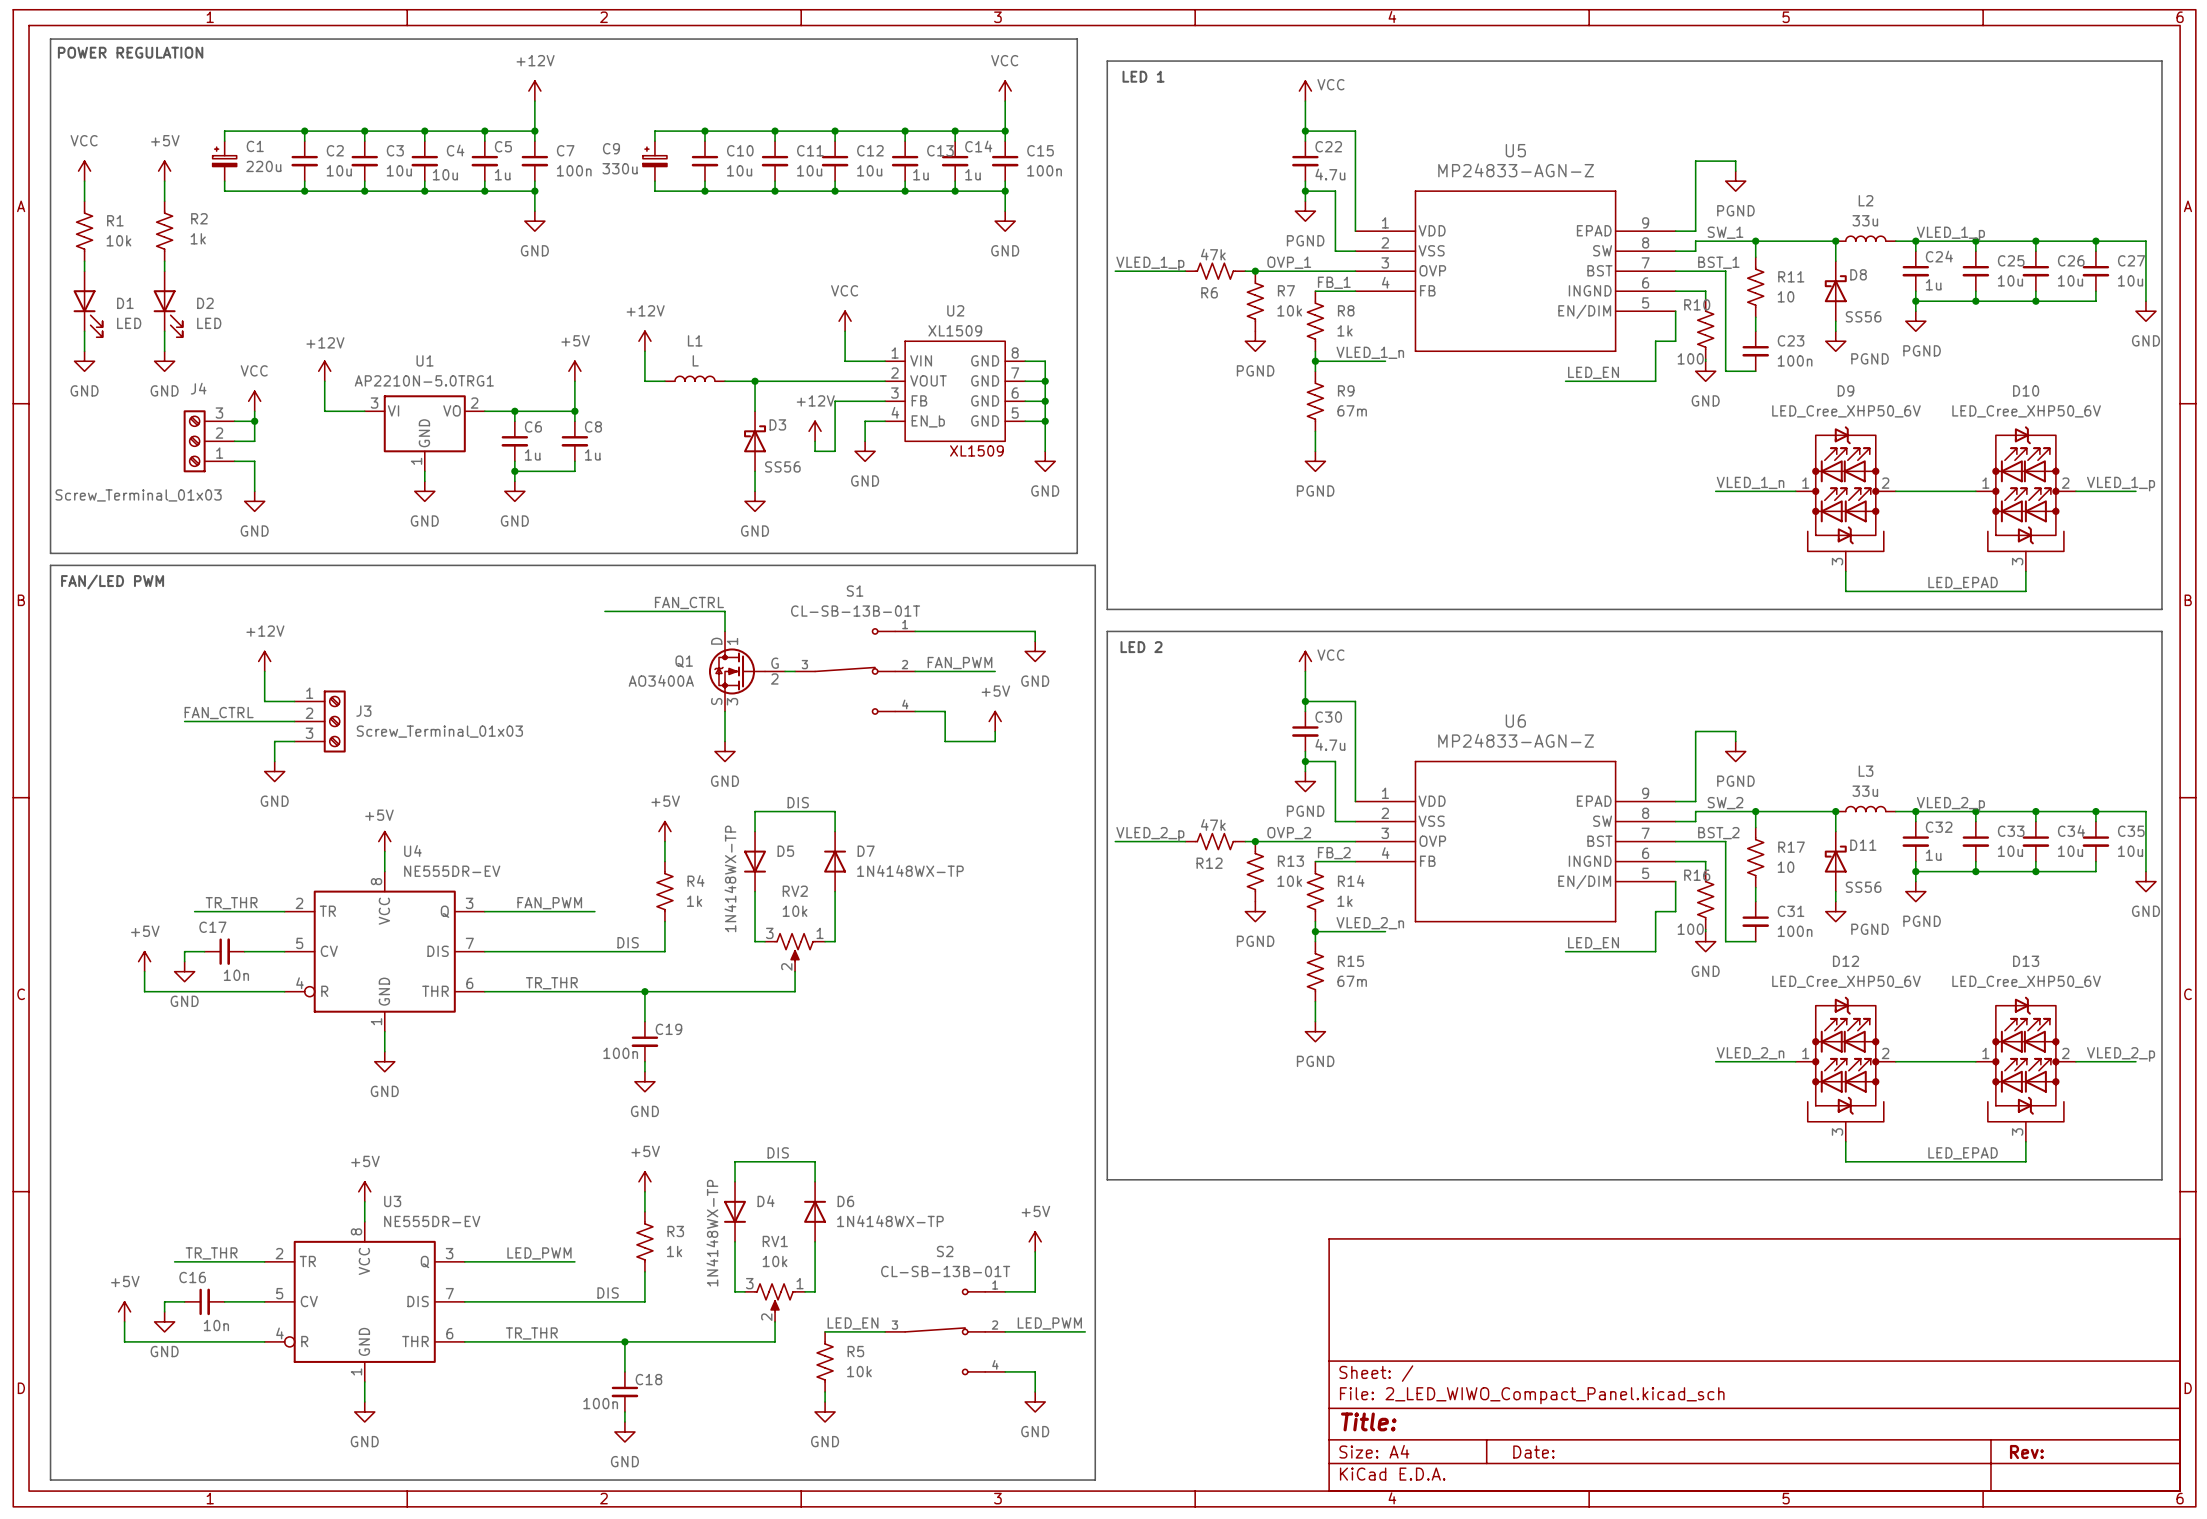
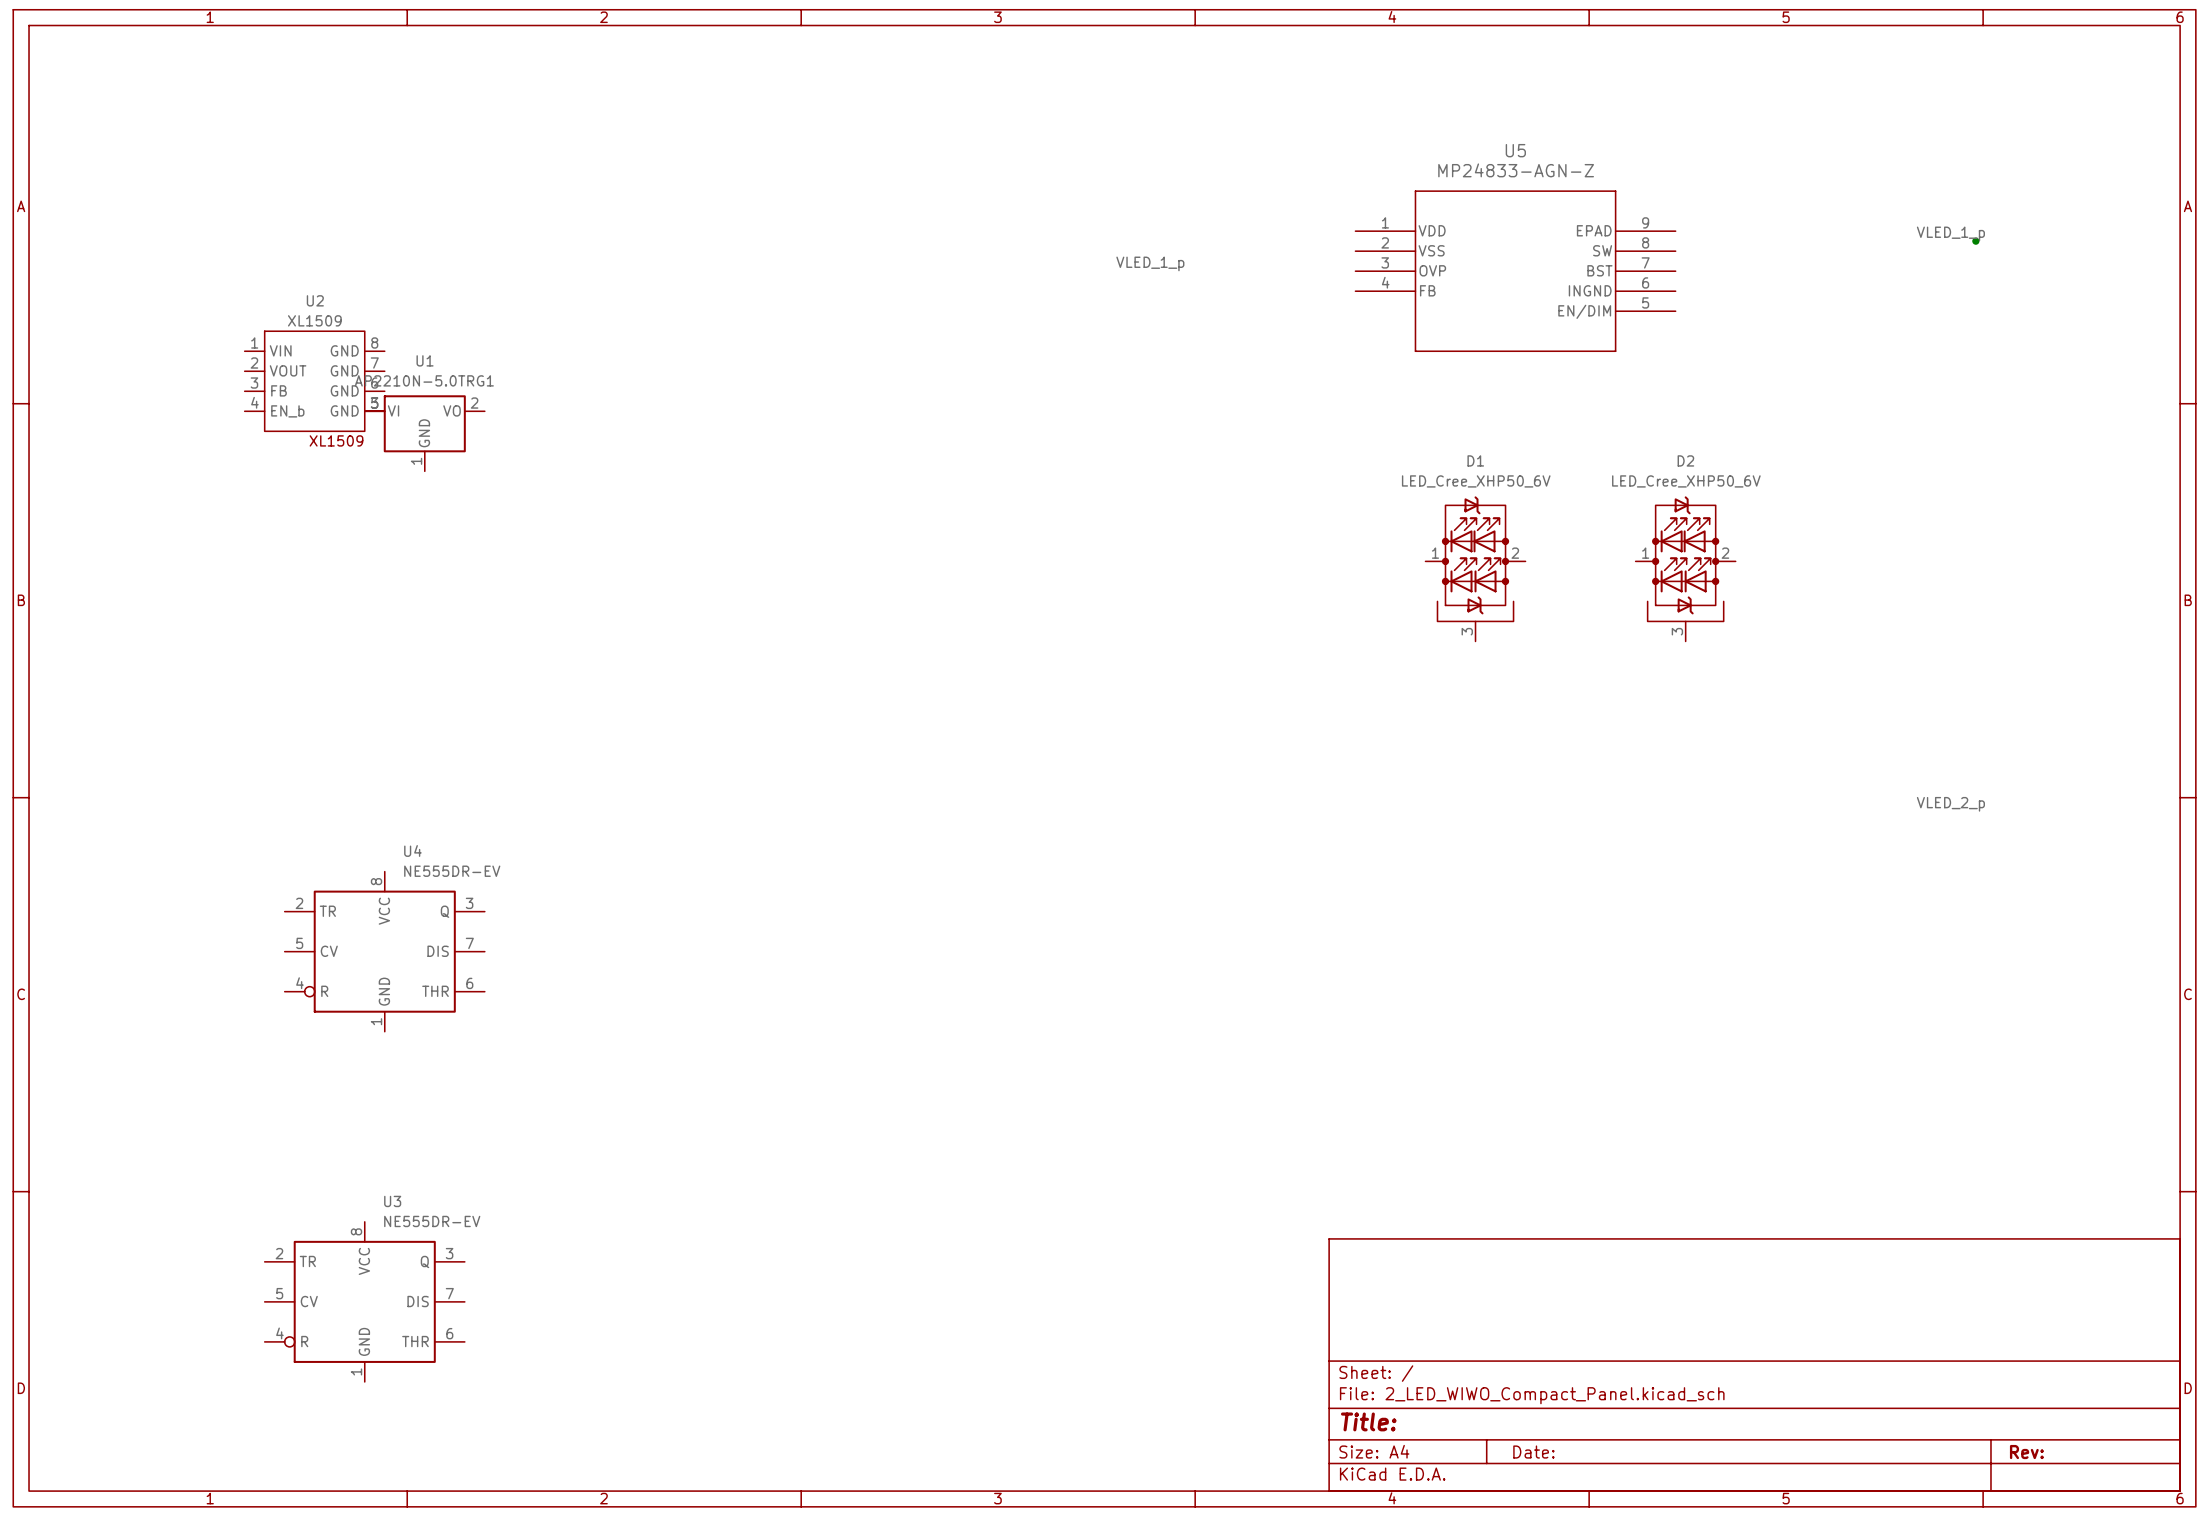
line: (50, 39) (50, 553) (1077, 553) (1077, 39) (50, 39) -> none
text: POWER REGULATION (130, 52) -> none
line: (1107, 61) (2161, 61) (2161, 609) (1107, 609) (1107, 61) -> none
text: LED 1 (1143, 76) -> none
power symbol: +12V (534, 91) -> none
power symbol: VCC (1005, 91) -> none
power symbol: VCC (1305, 91) -> none
wire: (534, 101) (534, 141) -> none
wire: (1005, 101) (1005, 141) -> none
wire: (1305, 101) (1305, 141) -> none
wire: (304, 131) (304, 141) -> none
junction: (304, 131) -> none
wire: (364, 131) (364, 141) -> none
junction: (364, 131) -> none
wire: (424, 131) (424, 141) -> none
junction: (424, 131) -> none
wire: (484, 131) (484, 141) -> none
junction: (484, 131) -> none
wire: (534, 131) (224, 131) (224, 141) -> none
junction: (534, 131) -> none
wire: (704, 131) (704, 141) -> none
junction: (704, 131) -> none
wire: (775, 131) (775, 141) -> none
junction: (775, 131) -> none
wire: (835, 131) (835, 141) -> none
junction: (835, 131) -> none
wire: (905, 131) (905, 141) -> none
junction: (905, 131) -> none
wire: (955, 131) (955, 141) -> none
junction: (955, 131) -> none
wire: (1005, 131) (654, 131) (654, 141) -> none
junction: (1005, 131) -> none
wire: (1305, 131) (1355, 131) (1355, 231) -> none
junction: (1305, 131) -> none
C1: 220u (224, 161) -> none
C2: 10u (304, 161) -> none
C3: 10u (364, 161) -> none
C4: 10u (424, 161) -> none
C5: 1u (484, 161) -> none
C7: 100n (534, 161) -> none
C9: 330u (654, 161) -> none
C10: 10u (704, 161) -> none
C11: 10u (775, 161) -> none
C12: 10u (835, 161) -> none
C13: 1u (905, 161) -> none
C14: 1u (955, 161) -> none
C15: 100n (1005, 161) -> none
C22: 4.7u (1305, 161) -> none
power symbol: VCC (84, 171) -> none
power symbol: +5V (164, 171) -> none
wire: (1735, 171) (1735, 161) (1695, 161) (1695, 231) (1675, 231) -> none
wire: (84, 181) (84, 201) -> none
wire: (164, 181) (164, 201) -> none
wire: (224, 181) (224, 191) (534, 191) -> none
wire: (304, 181) (304, 191) -> none
wire: (364, 181) (364, 191) -> none
wire: (424, 181) (424, 191) -> none
wire: (484, 181) (484, 191) -> none
wire: (534, 181) (534, 211) -> none
wire: (654, 181) (654, 191) (1005, 191) -> none
wire: (704, 181) (704, 191) -> none
wire: (775, 181) (775, 191) -> none
wire: (835, 181) (835, 191) -> none
wire: (905, 181) (905, 191) -> none
wire: (955, 181) (955, 191) -> none
wire: (1005, 181) (1005, 211) -> none
wire: (1305, 181) (1305, 201) -> none
power symbol: PGND (1735, 181) -> none
junction: (304, 191) -> none
junction: (364, 191) -> none
junction: (424, 191) -> none
junction: (484, 191) -> none
junction: (534, 191) -> none
junction: (704, 191) -> none
junction: (775, 191) -> none
junction: (835, 191) -> none
junction: (905, 191) -> none
junction: (955, 191) -> none
junction: (1005, 191) -> none
wire: (1305, 191) (1335, 191) (1335, 251) (1355, 251) -> none
junction: (1305, 191) -> none
power symbol: PGND (1305, 211) -> none
power symbol: GND (534, 221) -> none
power symbol: GND (1005, 221) -> none
R1: 10k (84, 231) -> none
R2: 1k (164, 231) -> none
label: SW_1 (1725, 232) -> none
L2: 33u (1865, 238) -> none
wire: (1755, 241) (1755, 257) -> none
junction: (1755, 241) -> none
junction: (1835, 241) -> none
wire: (1895, 241) (2145, 241) (2145, 301) -> none
wire: (1915, 241) (1915, 251) -> none
junction: (1915, 241) -> none
wire: (1975, 241) (1975, 251) -> none
wire: (2035, 241) (2035, 251) -> none
junction: (2035, 241) -> none
wire: (2095, 241) (2095, 251) -> none
junction: (2095, 241) -> none
wire: (1675, 251) (1695, 251) (1695, 241) (1835, 241) (1835, 261) -> none
wire: (84, 261) (84, 271) -> none
wire: (164, 261) (164, 271) -> none
label: OVP_1 (1289, 262) -> none
label: BST_1 (1718, 262) -> none
D1 symbol: [73, 271, 103, 338] -> [1425, 496, 1526, 642]
D2 symbol: [153, 271, 183, 338] -> [1635, 496, 1736, 642]
wire: (1115, 271) (1185, 271) -> none
R6: 47k (1215, 271) -> none
wire: (1245, 271) (1355, 271) -> none
junction: (1255, 271) -> none
wire: (1675, 271) (1725, 271) (1725, 371) (1755, 371) -> none
C24: 1u (1915, 271) -> none
C25: 10u (1975, 271) -> none
C26: 10u (2035, 271) -> none
C27: 10u (2095, 271) -> none
label: FB_1 (1334, 282) -> none
R11: 10 (1755, 287) -> none
wire: (1315, 291) (1355, 291) -> none
wire: (1675, 291) (1705, 291) (1705, 299) -> none
D8: SS56 (1835, 291) -> none
wire: (1915, 291) (1915, 311) -> none
wire: (1975, 291) (1975, 301) -> none
wire: (2035, 291) (2035, 301) -> none
wire: (2095, 291) (2095, 301) (1915, 301) -> none
R7: 10k (1255, 301) -> none
junction: (1915, 301) -> none
junction: (1975, 301) -> none
junction: (2035, 301) -> none
D1 name position: D1 (125, 303) -> D1 (1475, 460)
D2 name position: D2 (205, 303) -> D2 (1685, 460)
wire: (1675, 311) (1675, 341) (1655, 341) (1655, 381) (1565, 381) -> none
power symbol: GND (2145, 311) -> none
wire: (1755, 317) (1755, 331) -> none
power symbol: VCC (845, 321) -> none
R8: 1k (1315, 321) -> none
wire: (1835, 321) (1835, 331) -> none
power symbol: PGND (1915, 321) -> none
D1 value: LED (129, 323) -> LED_Cree_XHP50_6V (1476, 481)
D2 value: LED (209, 323) -> LED_Cree_XHP50_6V (1686, 481)
R10: 100 (1705, 329) -> none
wire: (84, 331) (84, 351) -> none
wire: (164, 331) (164, 351) -> none
wire: (845, 331) (845, 361) (885, 361) -> none
power symbol: +12V (644, 341) -> none
power symbol: PGND (1255, 341) -> none
power symbol: PGND (1835, 341) -> none
wire: (644, 351) (644, 381) (664, 381) -> none
wire: (1315, 351) (1315, 371) -> none
C23: 100n (1755, 351) -> none
label: VLED_1_n (1370, 352) -> none
wire: (1705, 359) (1705, 361) -> none
power symbol: GND (84, 361) -> none
power symbol: GND (164, 361) -> none
wire: (1025, 361) (1045, 361) (1045, 451) -> none
wire: (1315, 361) (1385, 361) -> none
junction: (1315, 361) -> none
power symbol: +12V (324, 371) -> none
power symbol: +5V (574, 371) -> none
power symbol: GND (1705, 371) -> none
label: LED_EN (1593, 372) -> none
L1: L (694, 378) -> none
wire: (324, 381) (324, 411) (364, 411) -> none
wire: (574, 381) (574, 421) -> none
wire: (725, 381) (885, 381) -> none
wire: (755, 381) (755, 411) -> none
junction: (755, 381) -> none
wire: (1025, 381) (1045, 381) -> none
junction: (1045, 381) -> none
U2 position: (955, 391) -> (314, 381)
power symbol: VCC (254, 401) -> none
wire: (885, 401) (835, 401) (835, 451) (815, 451) (815, 441) -> none
wire: (1025, 401) (1045, 401) -> none
junction: (1045, 401) -> none
R9: 67m (1315, 401) -> none
wire: (254, 411) (254, 441) (234, 441) -> none
wire: (484, 411) (574, 411) -> none
wire: (514, 411) (514, 421) -> none
junction: (514, 411) -> none
junction: (574, 411) -> none
wire: (234, 421) (254, 421) -> none
junction: (254, 421) -> none
wire: (885, 421) (865, 421) (865, 441) -> none
wire: (1025, 421) (1045, 421) -> none
junction: (1045, 421) -> none
power symbol: +12V (815, 431) -> none
wire: (1315, 431) (1315, 451) -> none
J4: Screw_Terminal_01x03 (209, 441) -> none
C6: 1u (514, 441) -> none
C8: 1u (574, 441) -> none
D3: SS56 (755, 441) -> none
power symbol: GND (865, 451) -> none
wire: (234, 461) (254, 461) (254, 491) -> none
wire: (514, 461) (514, 481) -> none
wire: (574, 461) (574, 471) (514, 471) -> none
power symbol: GND (1045, 461) -> none
power symbol: PGND (1315, 461) -> none
wire: (424, 471) (424, 481) -> none
junction: (514, 471) -> none
wire: (755, 471) (755, 491) -> none
label: VLED_1_n (1750, 482) -> none
label: VLED_1_p (2121, 484) -> none
power symbol: GND (424, 491) -> none
power symbol: GND (514, 491) -> none
wire: (1715, 491) (1795, 491) -> none
wire: (1895, 491) (1975, 491) -> none
wire: (2075, 491) (2135, 491) -> none
D9: LED_Cree_XHP50_6V (1845, 498) -> none
D10: LED_Cree_XHP50_6V (2025, 498) -> none
power symbol: GND (254, 501) -> none
power symbol: GND (755, 501) -> none
line: (50, 565) (1095, 565) (1095, 1480) (50, 1480) (50, 565) -> none
wire: (1845, 571) (1845, 591) (2025, 591) (2025, 571) -> none
text: FAN/LED PWM (112, 582) -> none
label: LED_EPAD (1963, 582) -> none
label: FAN_CTRL (689, 602) -> none
wire: (604, 611) (725, 611) (725, 631) -> none
wire: (915, 631) (1035, 631) (1035, 641) -> none
line: (1107, 631) (1107, 1179) (2161, 1179) (2161, 631) (1107, 631) -> none
text: LED 2 (1141, 647) -> none
power symbol: GND (1035, 651) -> none
power symbol: +12V (264, 661) -> none
power symbol: VCC (1305, 661) -> none
label: FAN_PWM (960, 663) -> none
wire: (264, 671) (264, 701) (294, 701) -> none
Q1: AO3400A (747, 671) -> none
wire: (785, 671) (795, 671) -> none
S1: CL-SB-13B-01T (855, 671) -> none
wire: (915, 671) (995, 671) -> none
wire: (1305, 671) (1305, 711) -> none
wire: (1305, 701) (1355, 701) (1355, 801) -> none
junction: (1305, 701) -> none
wire: (725, 711) (725, 741) -> none
wire: (915, 711) (945, 711) (945, 741) (995, 741) (995, 731) -> none
label: FAN_CTRL (219, 713) -> none
wire: (184, 721) (294, 721) -> none
J3: Screw_Terminal_01x03 (320, 721) -> none
power symbol: +5V (995, 721) -> none
C30: 4.7u (1305, 731) -> none
wire: (294, 741) (274, 741) (274, 761) -> none
wire: (1735, 741) (1735, 731) (1695, 731) (1695, 801) (1675, 801) -> none
power symbol: GND (725, 751) -> none
wire: (1305, 751) (1305, 771) -> none
power symbol: PGND (1735, 751) -> none
wire: (1305, 761) (1335, 761) (1335, 821) (1355, 821) -> none
junction: (1305, 761) -> none
power symbol: GND (274, 771) -> none
power symbol: PGND (1305, 781) -> none
label: DIS (798, 802) -> none
label: SW_2 (1725, 803) -> none
L3: 33u (1865, 809) -> none
wire: (1755, 811) (1755, 827) -> none
junction: (1755, 811) -> none
junction: (1835, 811) -> none
wire: (1895, 811) (2145, 811) (2145, 871) -> none
wire: (1915, 811) (1915, 821) -> none
junction: (1915, 811) -> none
wire: (1975, 811) (1975, 821) -> none
junction: (1975, 811) -> none
wire: (2035, 811) (2035, 821) -> none
junction: (2035, 811) -> none
wire: (2095, 811) (2095, 821) -> none
junction: (2095, 811) -> none
wire: (1675, 821) (1695, 821) (1695, 811) (1835, 811) (1835, 831) -> none
power symbol: +5V (664, 831) -> none
wire: (755, 831) (755, 811) (835, 811) (835, 831) -> none
label: OVP_2 (1289, 833) -> none
label: BST_2 (1718, 833) -> none
label: VLED_2_p (1150, 834) -> none
power symbol: +5V (384, 841) -> none
wire: (664, 841) (664, 861) -> none
wire: (1115, 841) (1185, 841) -> none
R12: 47k (1215, 841) -> none
wire: (1245, 841) (1355, 841) -> none
junction: (1255, 841) -> none
U6: MP24833-AGN-Z (1515, 841) -> none
wire: (1675, 841) (1725, 841) (1725, 941) (1755, 941) -> none
C32: 1u (1915, 841) -> none
C33: 10u (1975, 841) -> none
C34: 10u (2035, 841) -> none
C35: 10u (2095, 841) -> none
wire: (384, 851) (384, 871) -> none
label: FB_2 (1334, 853) -> none
R17: 10 (1755, 857) -> none
D5: 1N4148WX-TP (755, 861) -> none
D7: 1N4148WX-TP (835, 861) -> none
wire: (1315, 861) (1355, 861) -> none
wire: (1675, 861) (1705, 861) (1705, 869) -> none
D11: SS56 (1835, 861) -> none
wire: (1915, 861) (1915, 881) -> none
wire: (1975, 861) (1975, 871) -> none
wire: (2035, 861) (2035, 871) -> none
wire: (2095, 861) (2095, 871) (1915, 871) -> none
R13: 10k (1255, 871) -> none
junction: (1915, 871) -> none
junction: (1975, 871) -> none
junction: (2035, 871) -> none
wire: (1675, 881) (1675, 911) (1655, 911) (1655, 951) (1565, 951) -> none
power symbol: GND (2145, 881) -> none
wire: (1755, 887) (1755, 901) -> none
R4: 1k (664, 891) -> none
wire: (755, 891) (755, 941) (765, 941) -> none
wire: (835, 891) (835, 941) (825, 941) -> none
R14: 1k (1315, 891) -> none
wire: (1835, 891) (1835, 901) -> none
power symbol: PGND (1915, 891) -> none
R16: 100 (1705, 899) -> none
label: TR_THR (231, 903) -> none
label: FAN_PWM (549, 903) -> none
wire: (194, 911) (284, 911) -> none
wire: (484, 911) (594, 911) -> none
power symbol: PGND (1255, 911) -> none
power symbol: PGND (1835, 911) -> none
wire: (664, 921) (664, 951) (484, 951) -> none
wire: (1315, 921) (1315, 941) -> none
C31: 100n (1755, 921) -> none
label: VLED_2_n (1370, 923) -> none
wire: (1705, 929) (1705, 931) -> none
wire: (1315, 931) (1385, 931) -> none
junction: (1315, 931) -> none
power symbol: GND (1705, 941) -> none
label: DIS (628, 942) -> none
label: LED_EN (1593, 943) -> none
wire: (204, 951) (184, 951) (184, 961) -> none
C17: 10n (224, 951) -> none
wire: (244, 951) (284, 951) -> none
RV2: 10k (795, 952) -> none
power symbol: +5V (144, 961) -> none
wire: (144, 971) (144, 991) (284, 991) -> none
power symbol: GND (184, 971) -> none
wire: (795, 971) (795, 991) (484, 991) -> none
R15: 67m (1315, 971) -> none
label: TR_THR (551, 983) -> none
wire: (644, 991) (644, 1021) -> none
junction: (644, 991) -> none
wire: (1315, 1001) (1315, 1021) -> none
wire: (384, 1031) (384, 1051) -> none
power symbol: PGND (1315, 1031) -> none
C19: 100n (644, 1041) -> none
label: VLED_2_n (1750, 1053) -> none
label: VLED_2_p (2121, 1054) -> none
power symbol: GND (384, 1061) -> none
wire: (644, 1061) (644, 1071) -> none
wire: (1715, 1061) (1795, 1061) -> none
wire: (1895, 1061) (1975, 1061) -> none
wire: (2075, 1061) (2135, 1061) -> none
D12: LED_Cree_XHP50_6V (1845, 1069) -> none
D13: LED_Cree_XHP50_6V (2025, 1069) -> none
power symbol: GND (644, 1081) -> none
wire: (1845, 1141) (1845, 1161) (2025, 1161) (2025, 1141) -> none
label: DIS (778, 1152) -> none
label: LED_EPAD (1963, 1153) -> none
power symbol: +5V (644, 1181) -> none
wire: (735, 1181) (735, 1161) (815, 1161) (815, 1181) -> none
power symbol: +5V (364, 1191) -> none
wire: (644, 1191) (644, 1211) -> none
wire: (364, 1201) (364, 1221) -> none
D4: 1N4148WX-TP (735, 1211) -> none
D6: 1N4148WX-TP (815, 1211) -> none
R3: 1k (644, 1241) -> none
wire: (735, 1241) (735, 1291) (745, 1291) -> none
wire: (815, 1241) (815, 1291) (805, 1291) -> none
power symbol: +5V (1035, 1241) -> none
wire: (1035, 1251) (1035, 1291) (1005, 1291) -> none
label: TR_THR (211, 1253) -> none
label: LED_PWM (539, 1253) -> none
wire: (174, 1261) (264, 1261) -> none
wire: (464, 1261) (574, 1261) -> none
wire: (644, 1271) (644, 1301) (464, 1301) -> none
label: DIS (608, 1292) -> none
wire: (184, 1301) (164, 1301) (164, 1311) -> none
C16: 10n (204, 1301) -> none
wire: (224, 1301) (264, 1301) -> none
RV1: 10k (775, 1302) -> none
power symbol: +5V (124, 1311) -> none
wire: (124, 1321) (124, 1341) (264, 1341) -> none
power symbol: GND (164, 1321) -> none
wire: (775, 1321) (775, 1341) (464, 1341) -> none
label: LED_EN (853, 1323) -> none
label: LED_PWM (1049, 1323) -> none
wire: (825, 1331) (885, 1331) -> none
S2: CL-SB-13B-01T (945, 1331) -> none
wire: (1005, 1331) (1085, 1331) -> none
label: TR_THR (531, 1333) -> none
wire: (624, 1341) (624, 1371) -> none
junction: (624, 1341) -> none
R5: 10k (825, 1361) -> none
wire: (1005, 1371) (1035, 1371) (1035, 1391) -> none
wire: (364, 1381) (364, 1401) -> none
C18: 100n (624, 1391) -> none
wire: (825, 1391) (825, 1401) -> none
power symbol: GND (1035, 1401) -> none
power symbol: GND (364, 1411) -> none
wire: (624, 1411) (624, 1421) -> none
power symbol: GND (825, 1411) -> none
power symbol: GND (624, 1431) -> none

